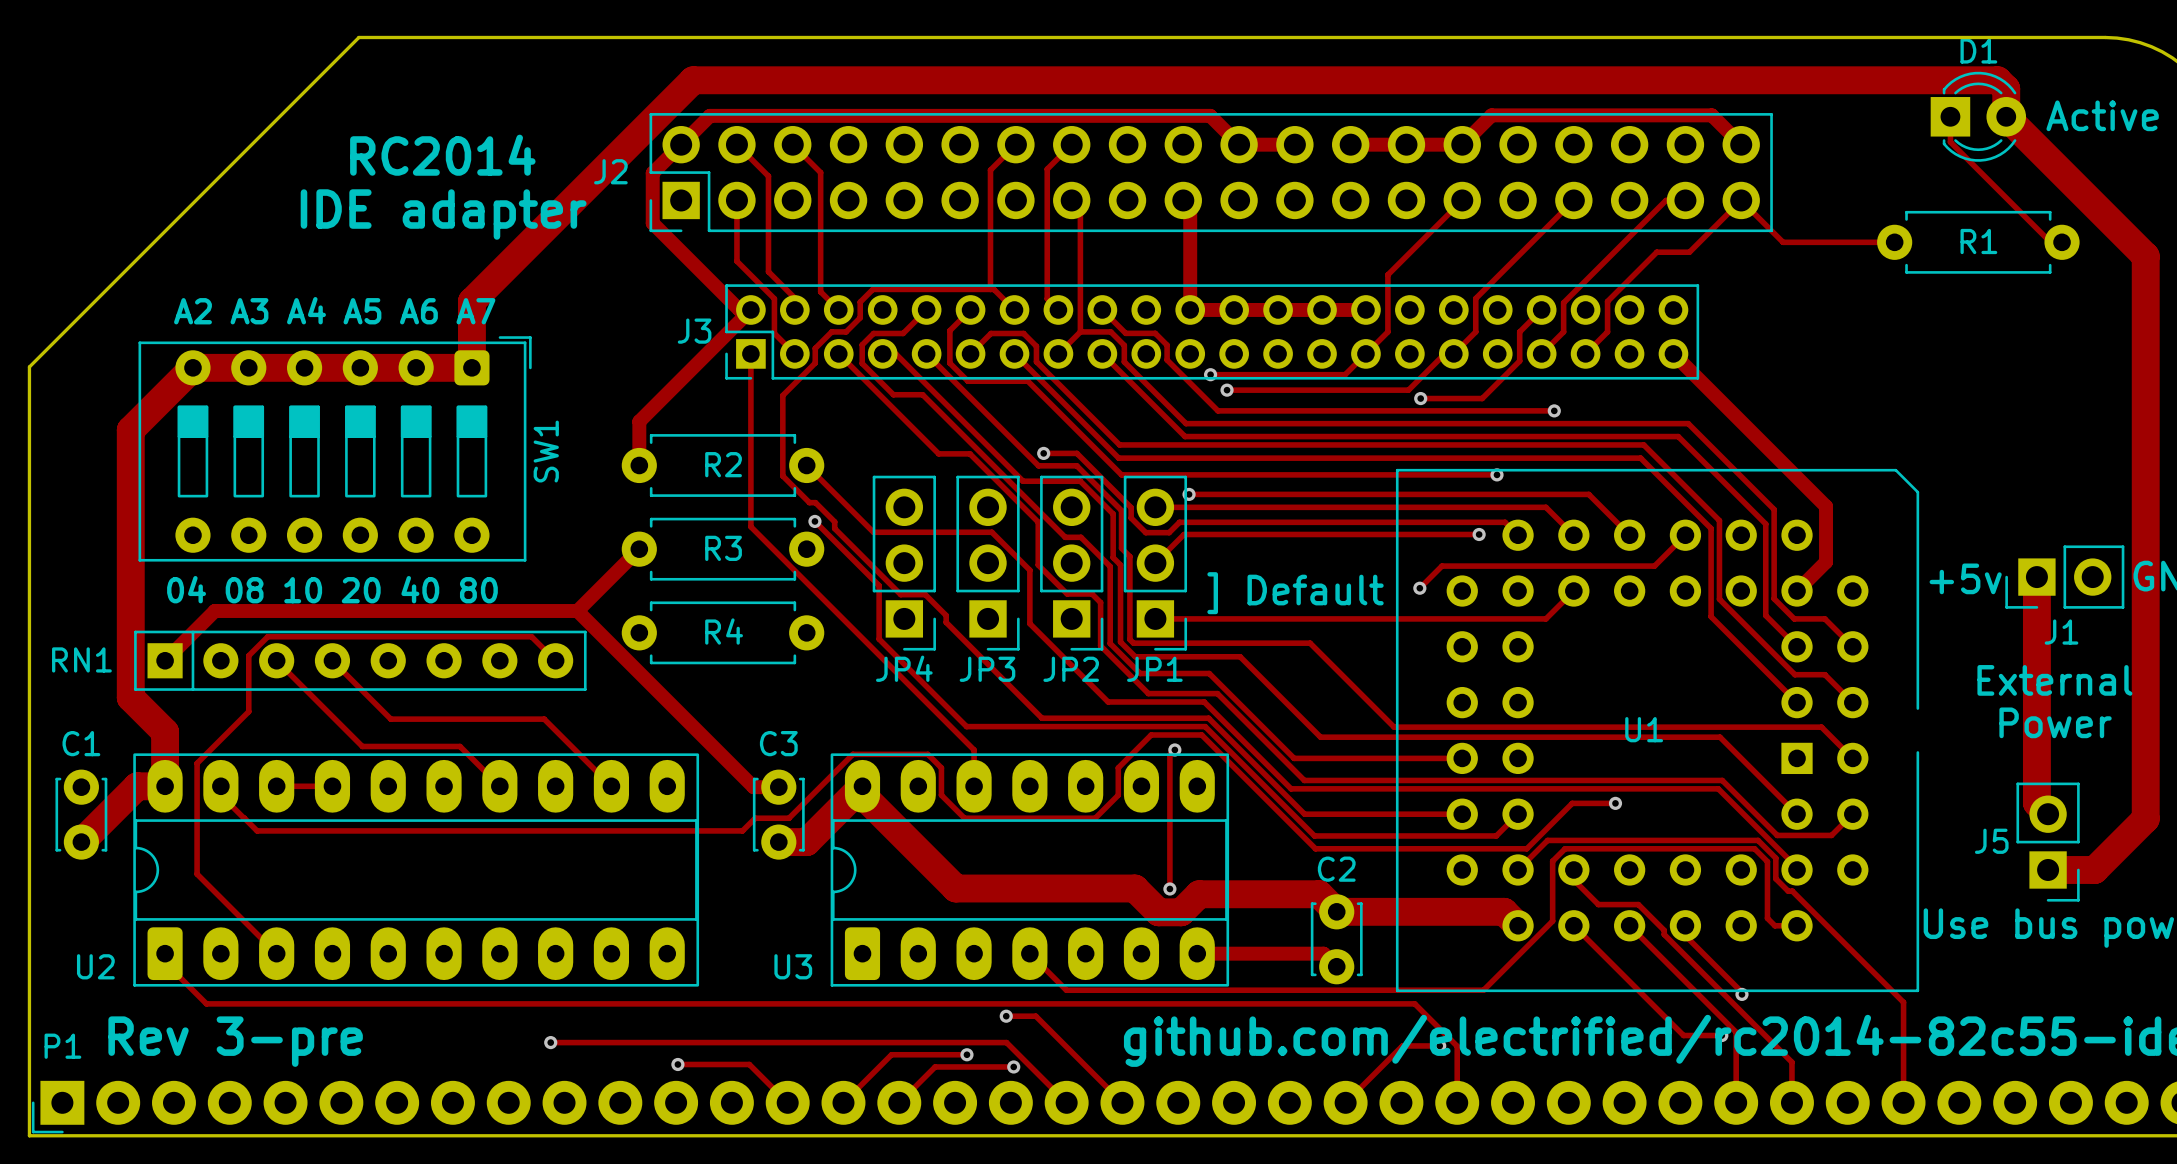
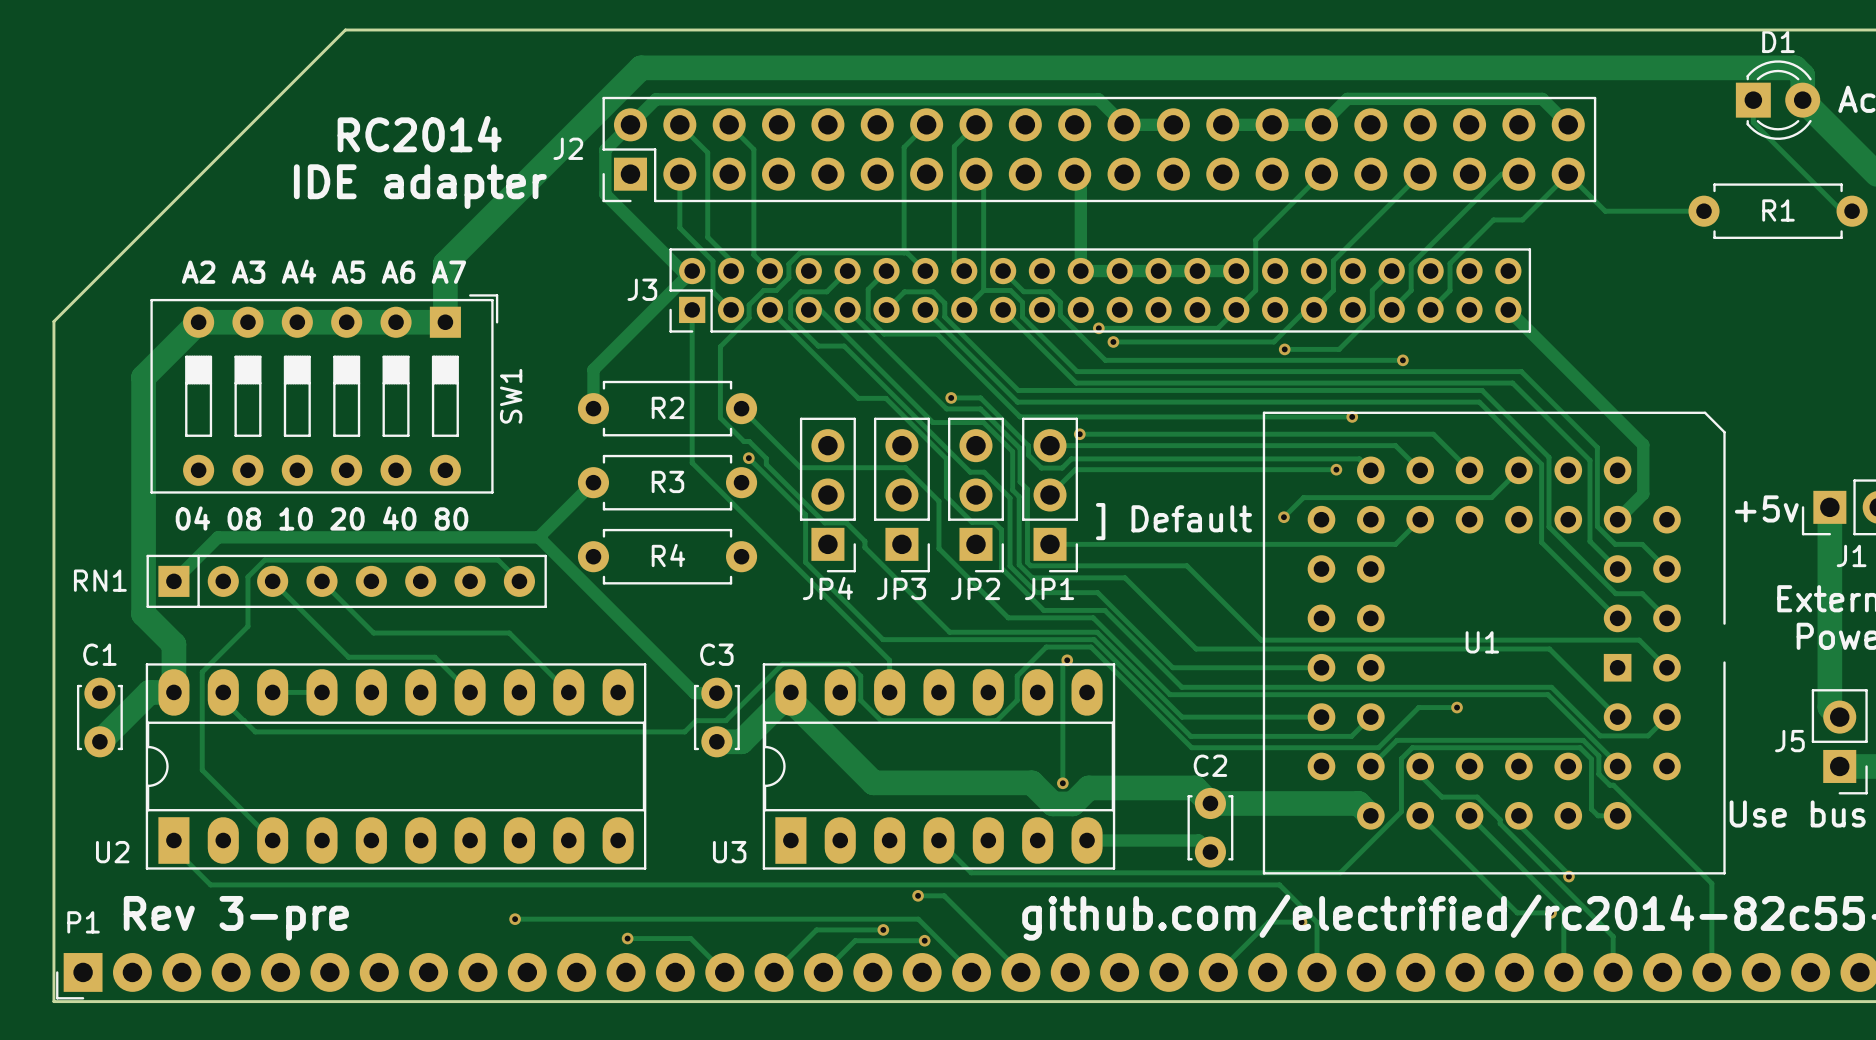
SW1 footprint: [138, 336, 532, 562] -> [150, 294, 499, 494]
U2 footprint: [133, 753, 700, 987] -> [145, 663, 647, 870]
U3 footprint: [830, 753, 1230, 987] -> [762, 663, 1116, 870]

